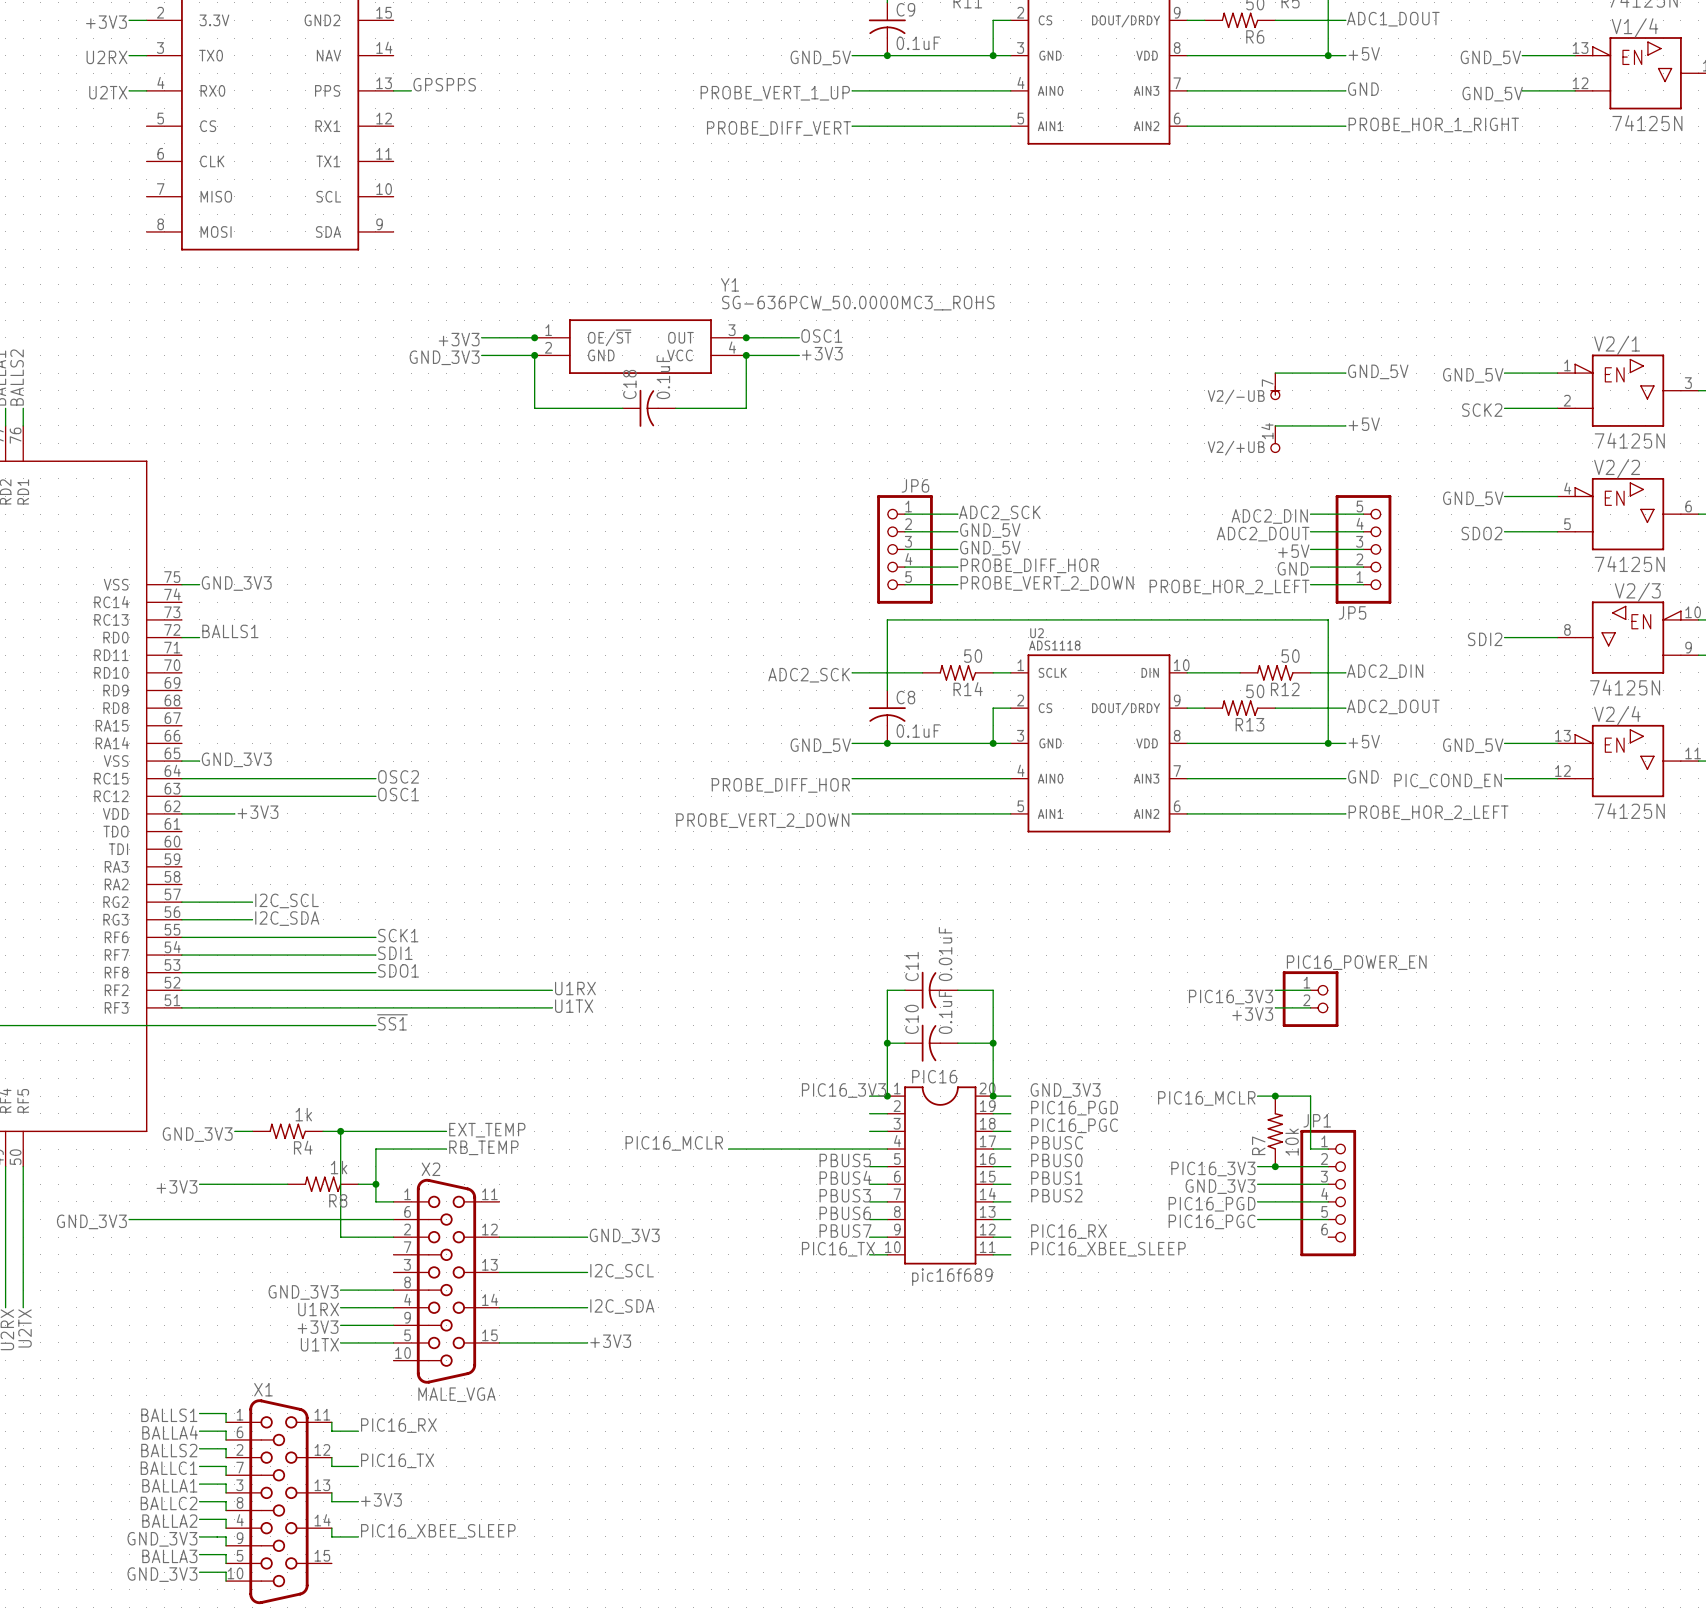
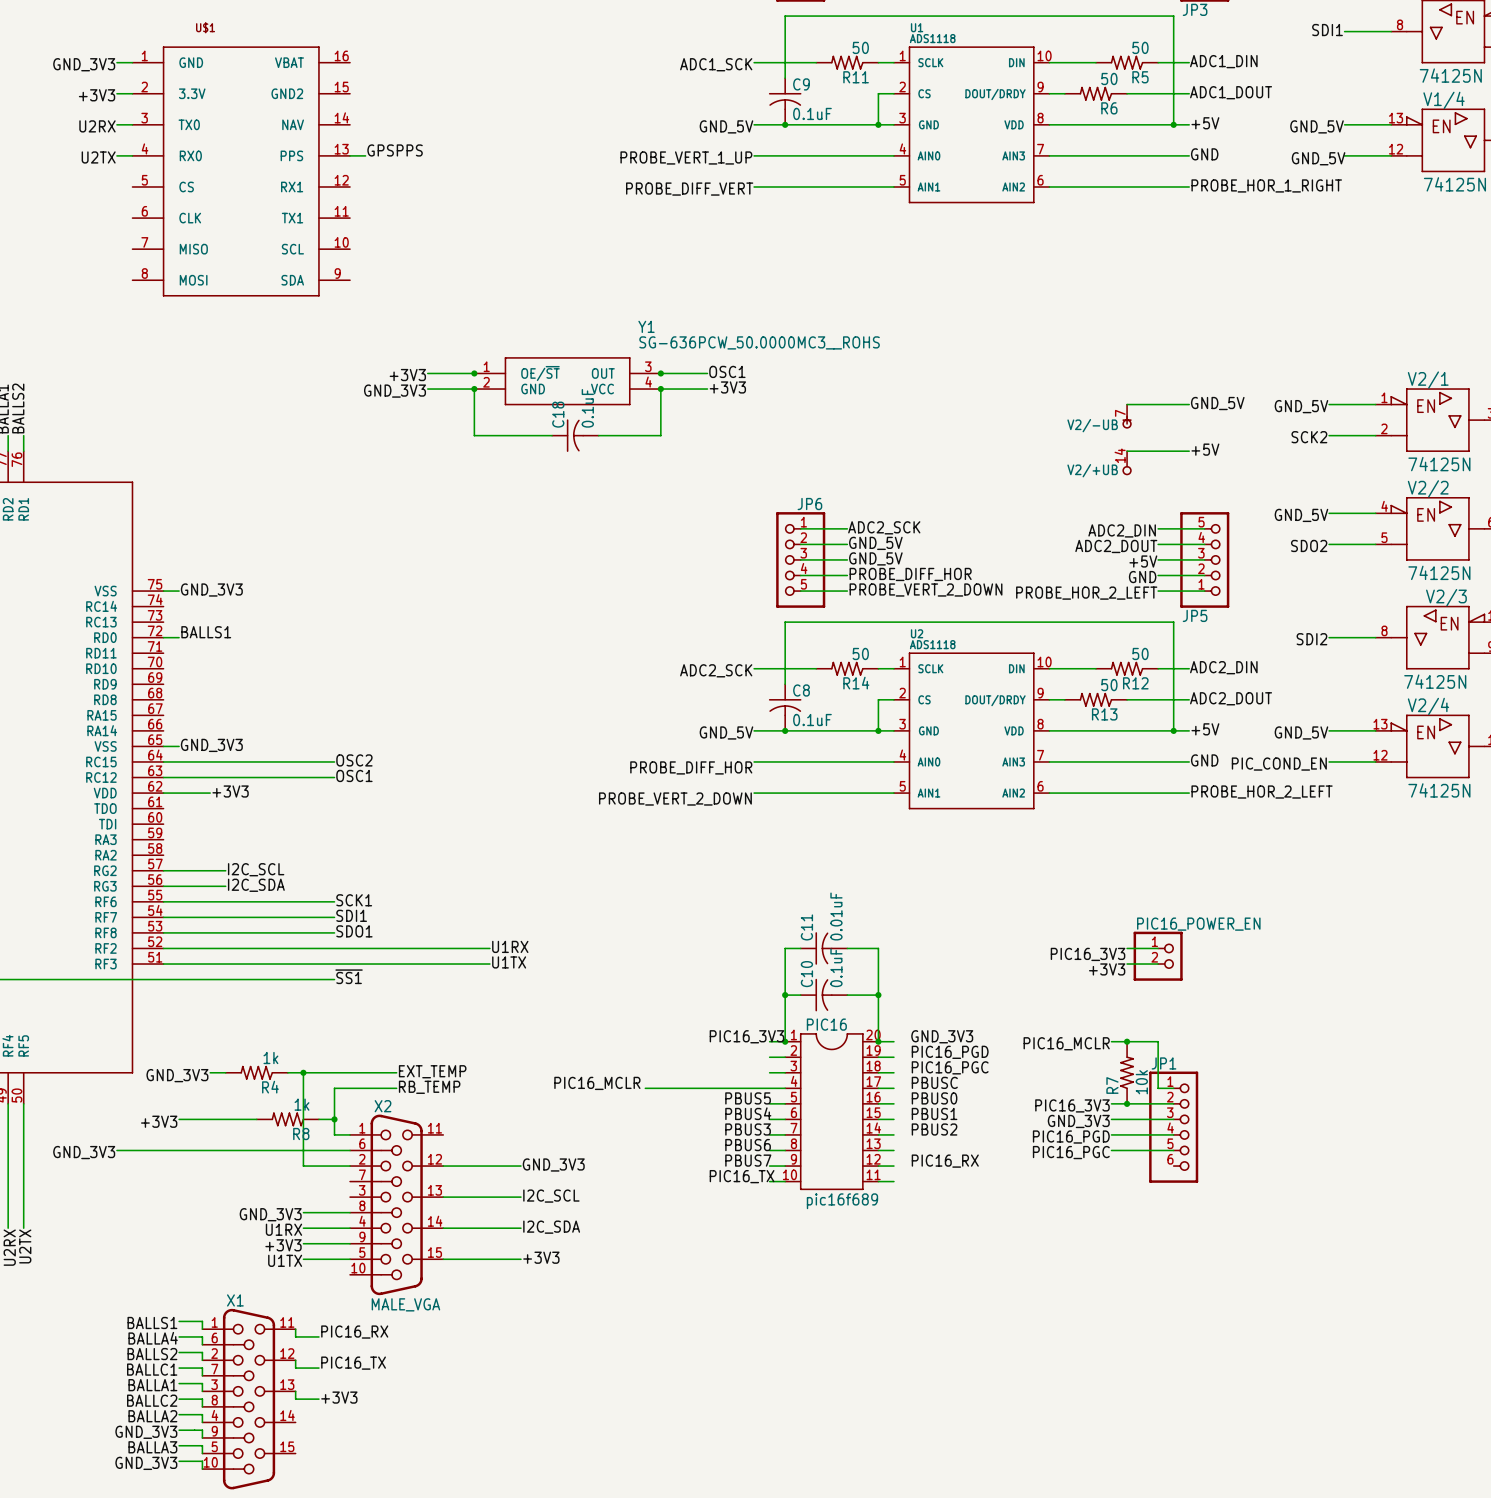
label: PIC16_XBEE_SLEEP (1108, 1249) -> none
wire: (331, 1528) (331, 1536) (358, 1536) -> none
label: PIC16_XBEE_SLEEP (438, 1531) -> none

